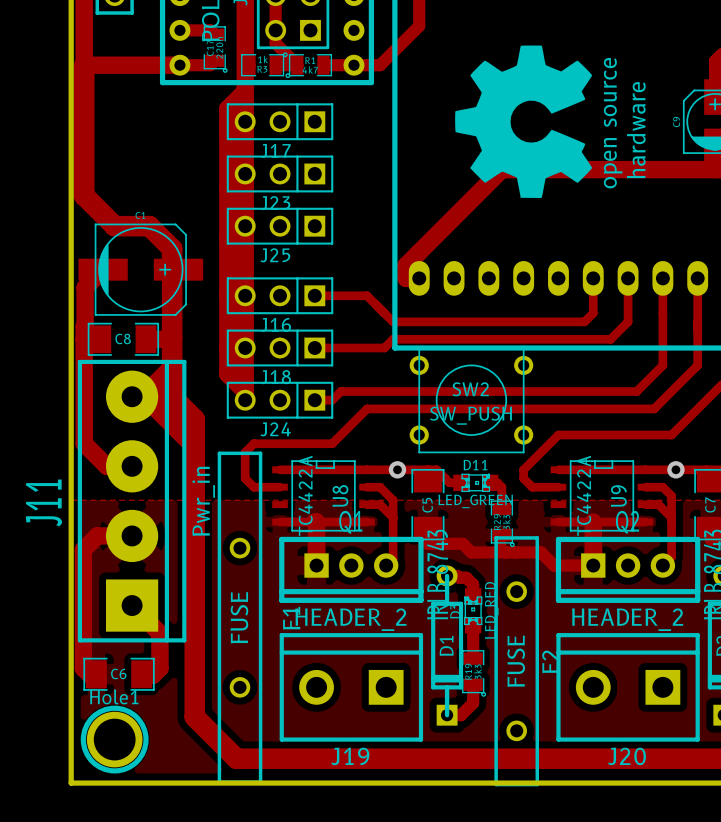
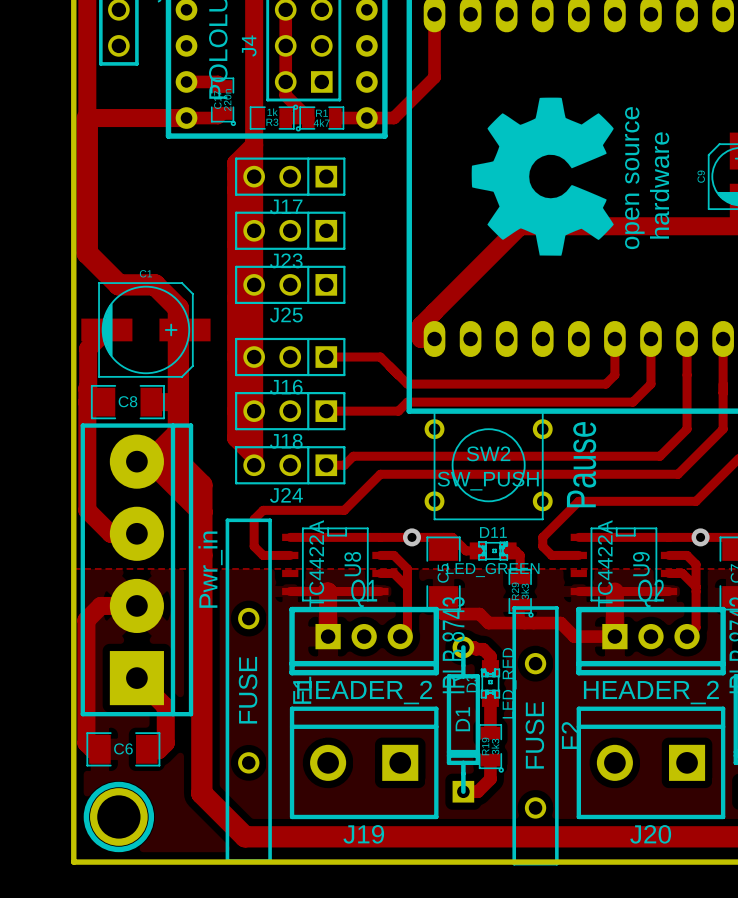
text: none -> Pause (581, 464)
J11 name: J11 (43, 502) -> none
Hole1 name: Hole1 (114, 696) -> none

